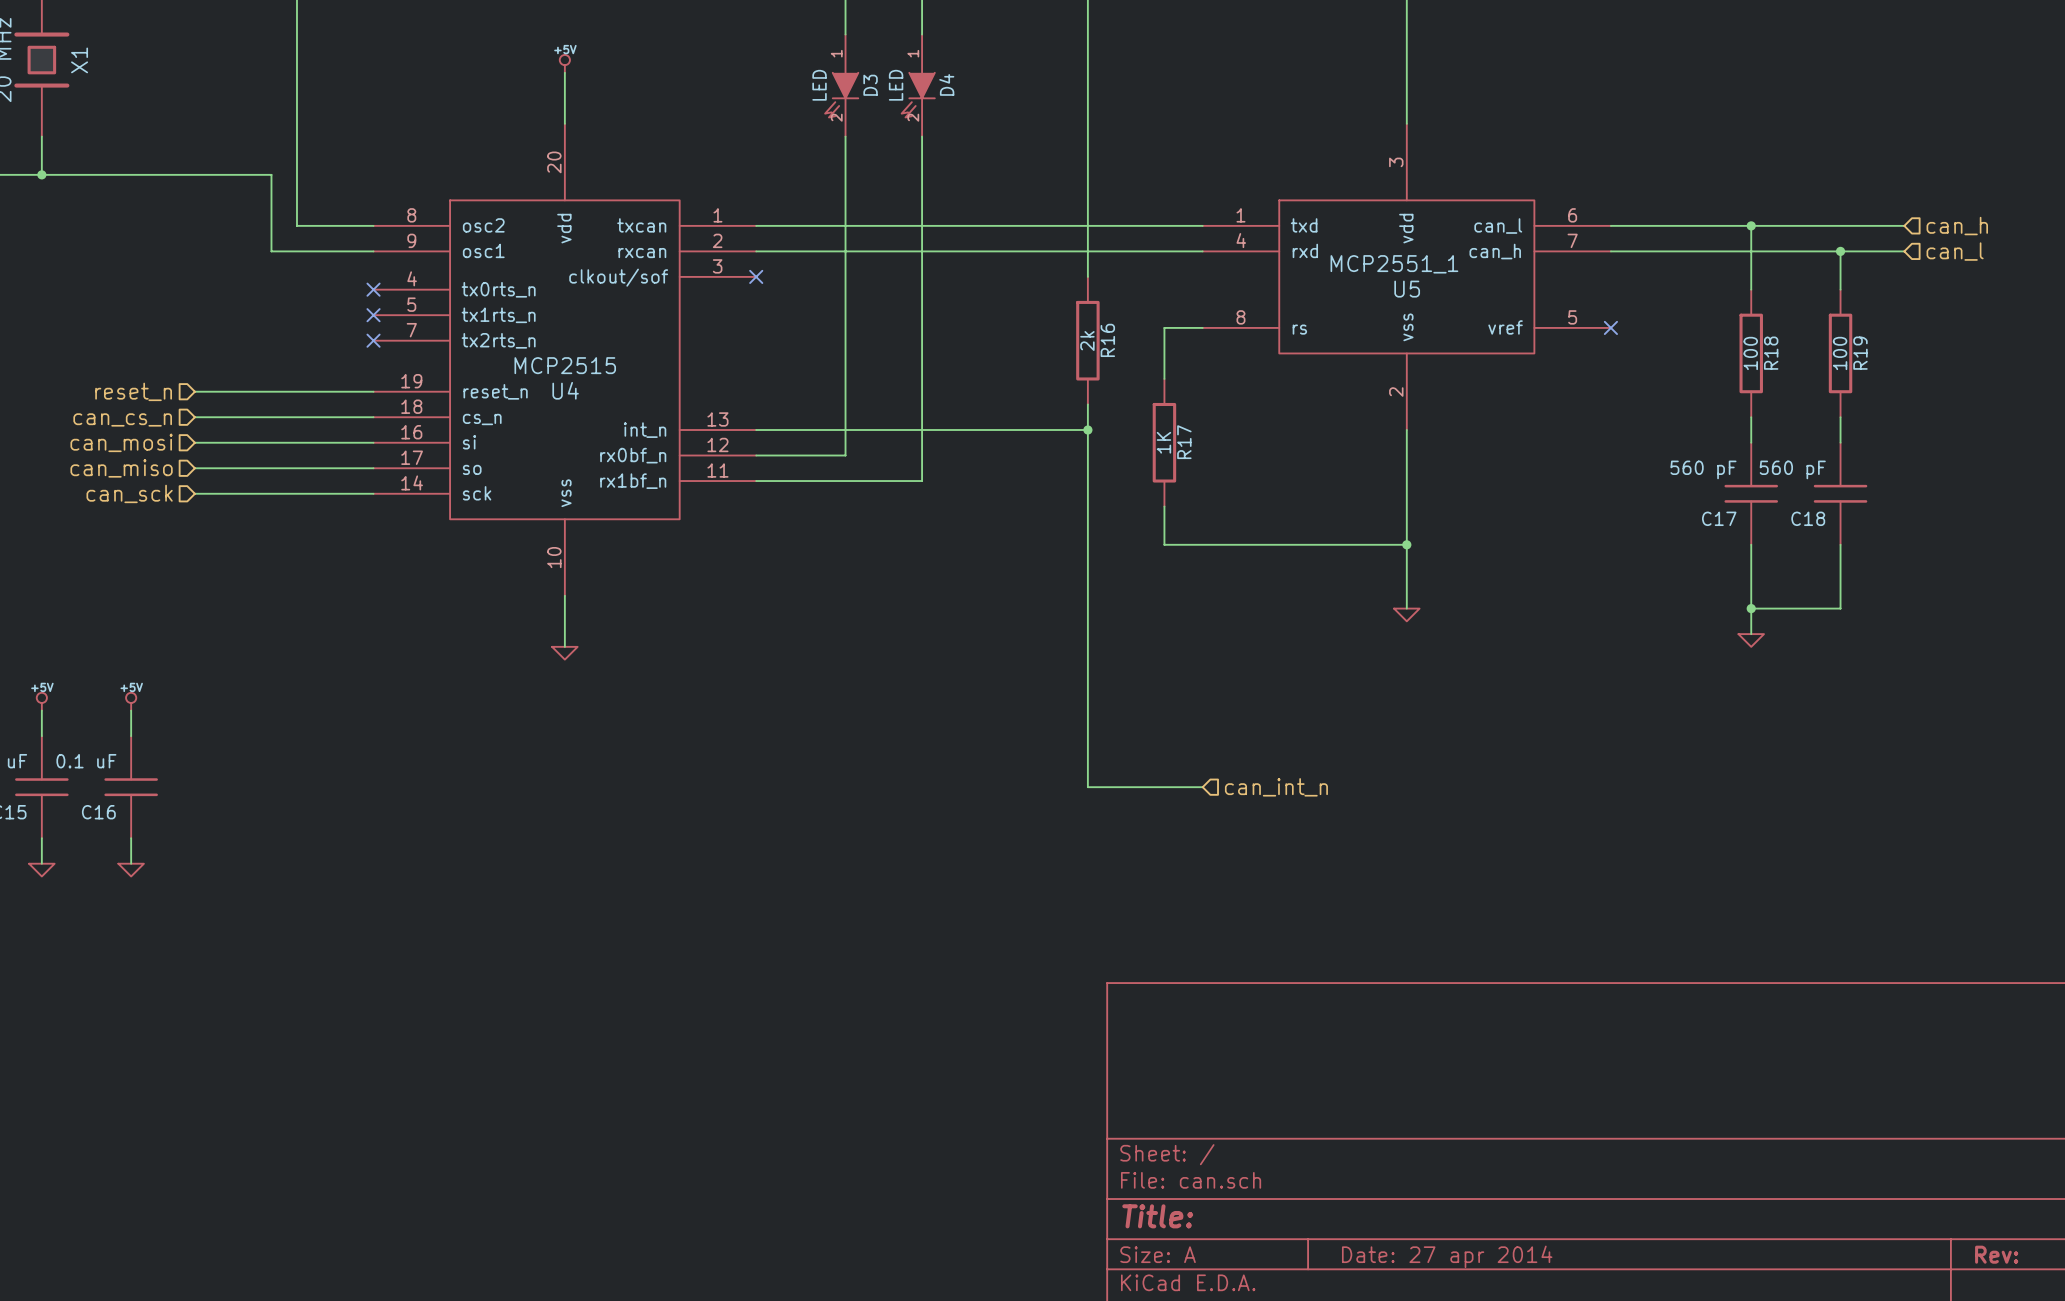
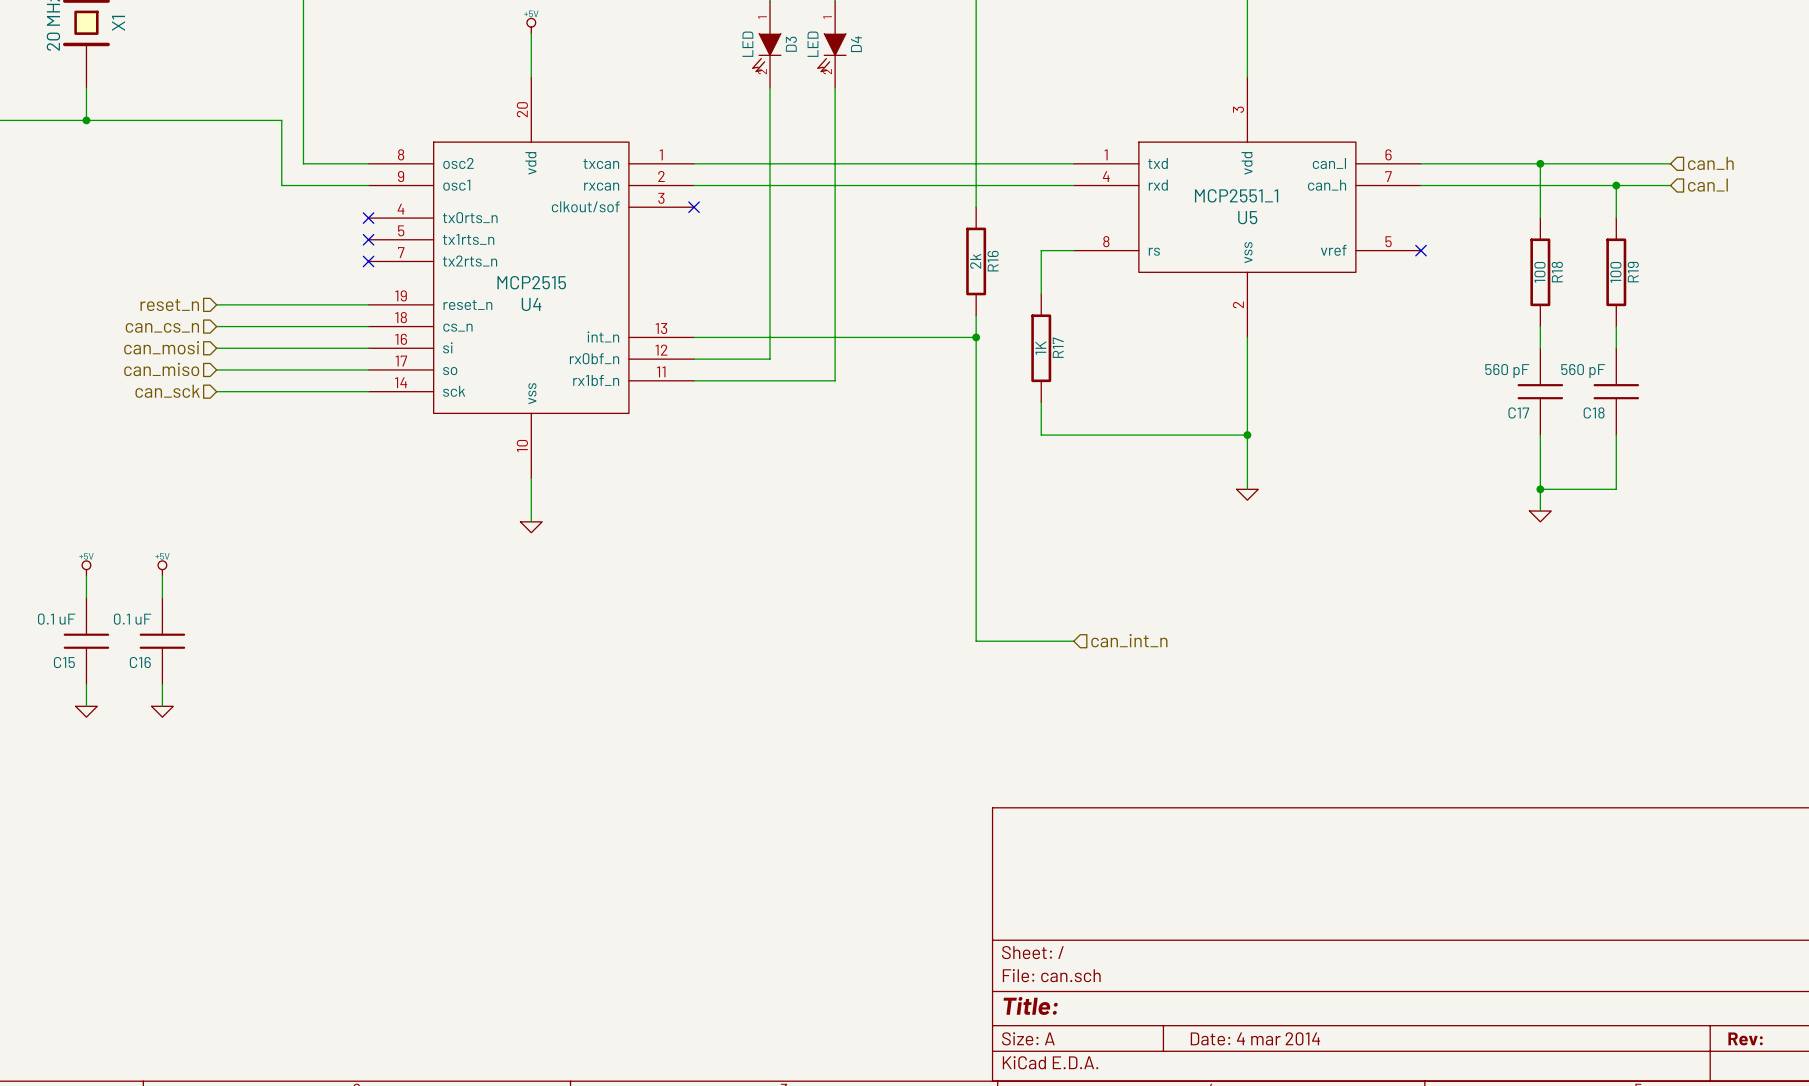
title block: Date: 27 apr 2014 (1447, 1256) -> Date: 4 mar 2014 (1255, 1038)

